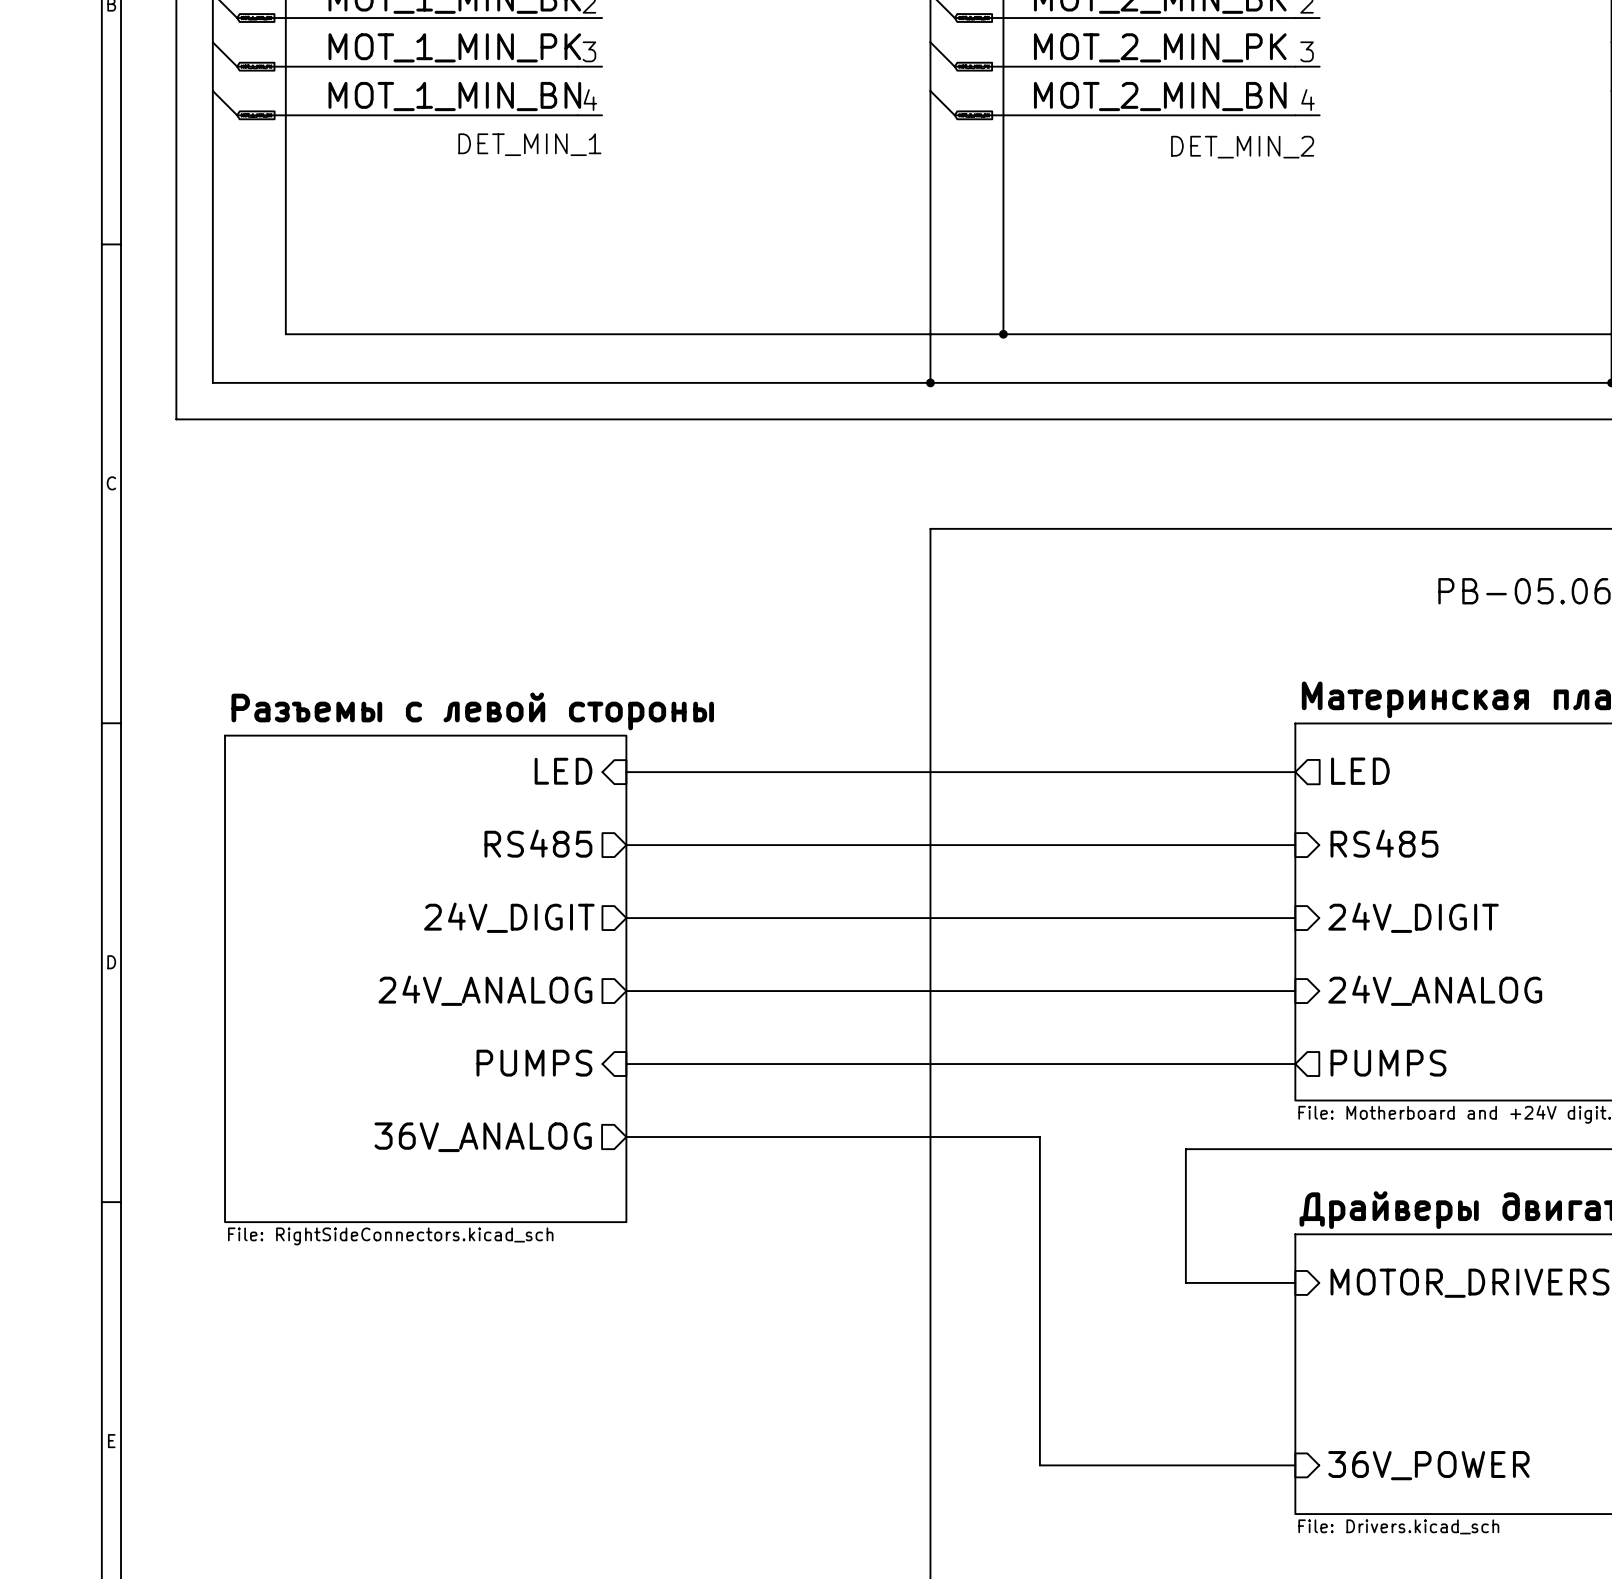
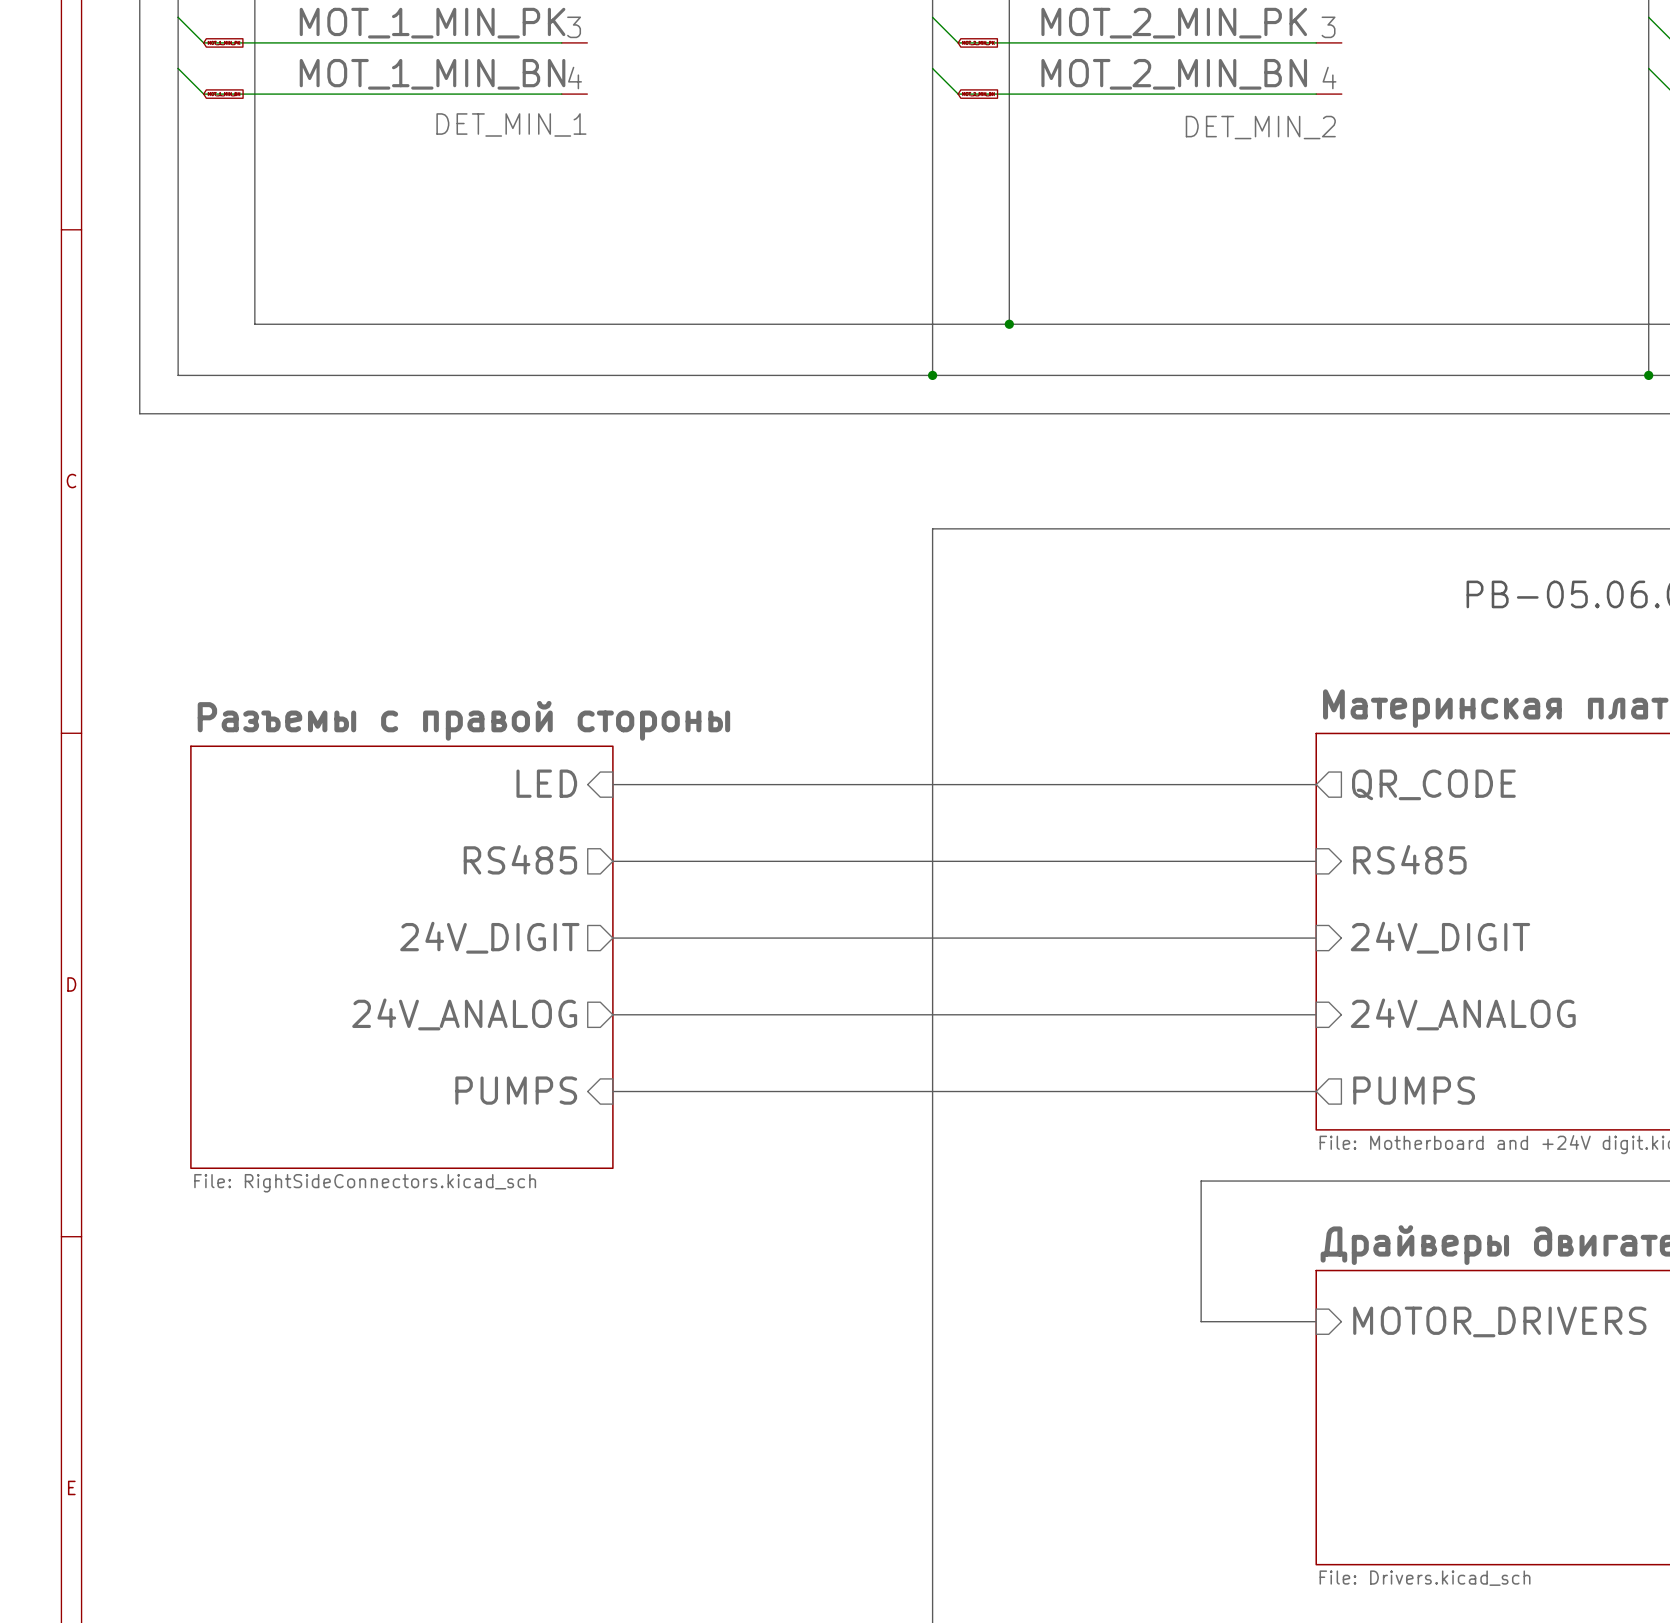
sheet pin: LED (1360, 771) -> QR_CODE (1433, 784)
sheet Разъемы с правой стороны: none -> File: RightSideConnectors.kicad_sch (401, 957)
sheet Разъемы с левой стороны: File: RightSideConnectors.kicad_sch (425, 978) -> none
sheet pin: 36V_ANALOG (483, 1137) -> none
bus: (626, 1137) (1039, 1137) (1039, 1465) (1295, 1465) -> none
sheet pin: 36V_POWER (1428, 1465) -> none

